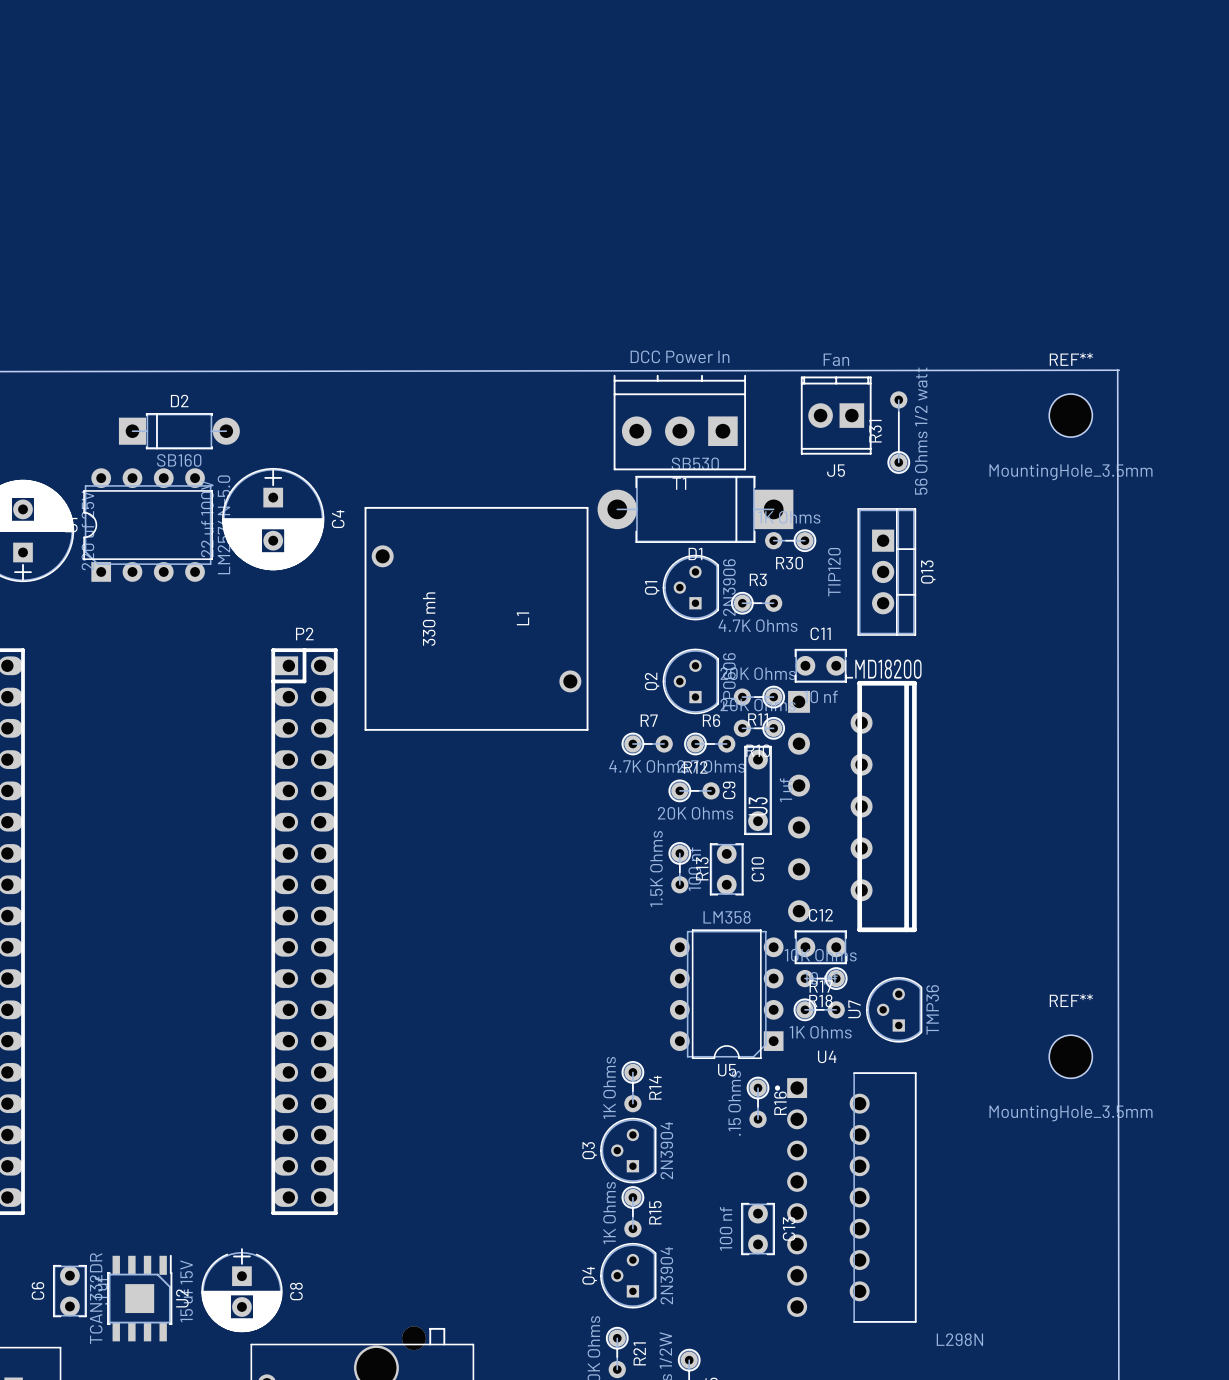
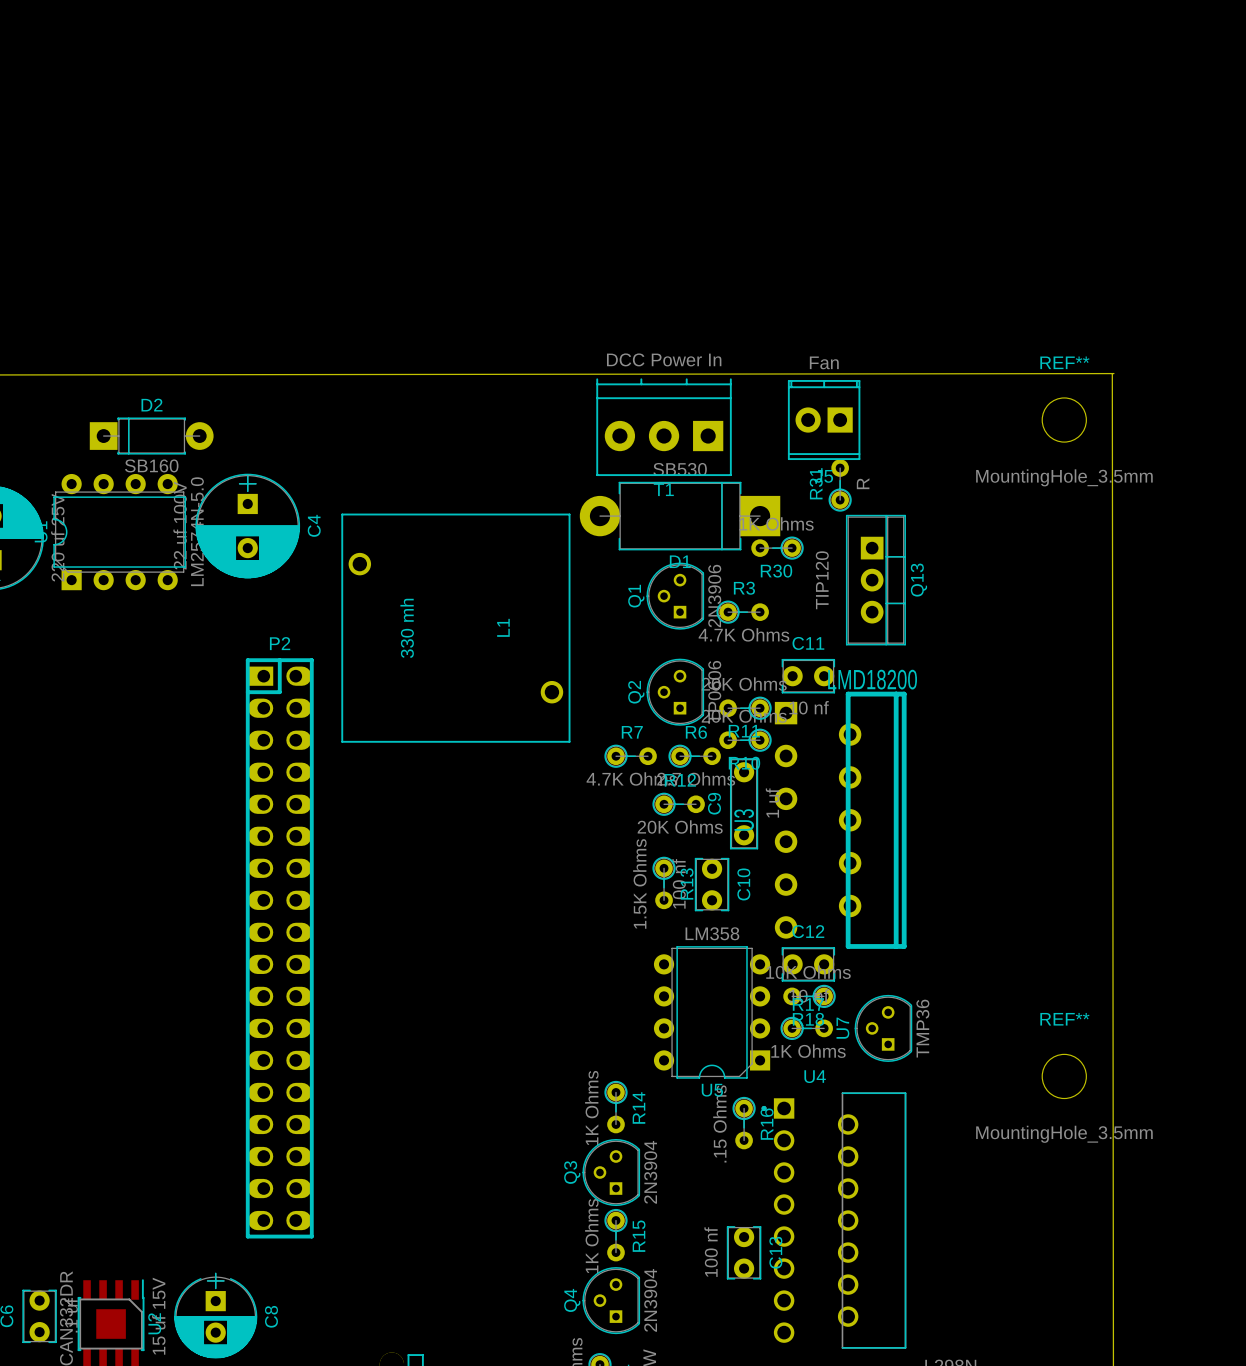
R31 footprint: [887, 391, 911, 474] -> [828, 459, 852, 512]
R31 value: 56 Ohms 1/2 watt (921, 431) -> R (863, 483)

